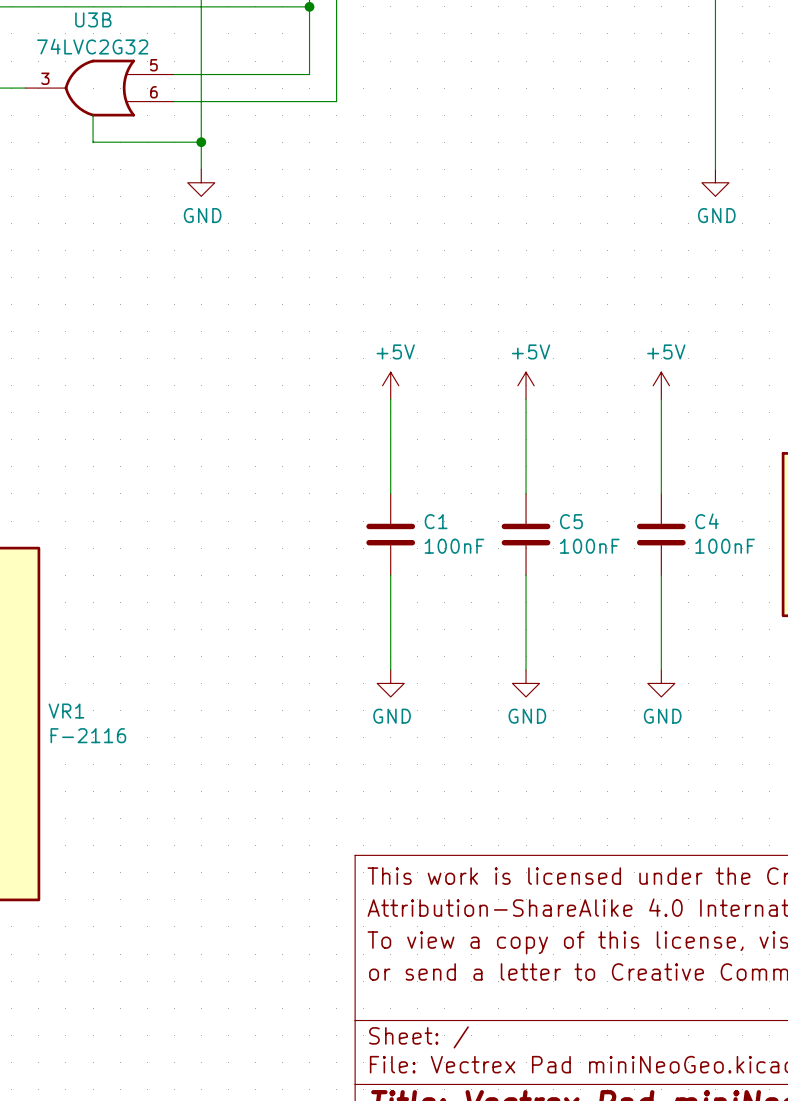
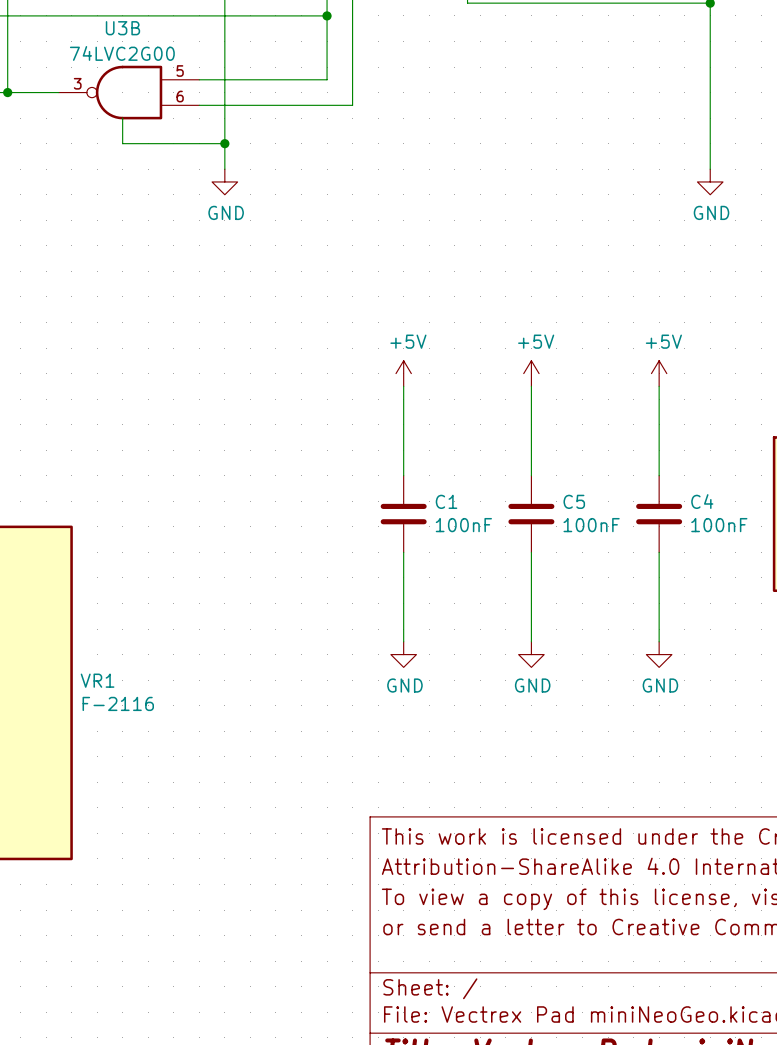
U3B value: 74LVC2G32 (92, 46) -> 74LVC2G00 (122, 53)
U3B symbol: [25, 59, 175, 117] -> [58, 65, 200, 120]

